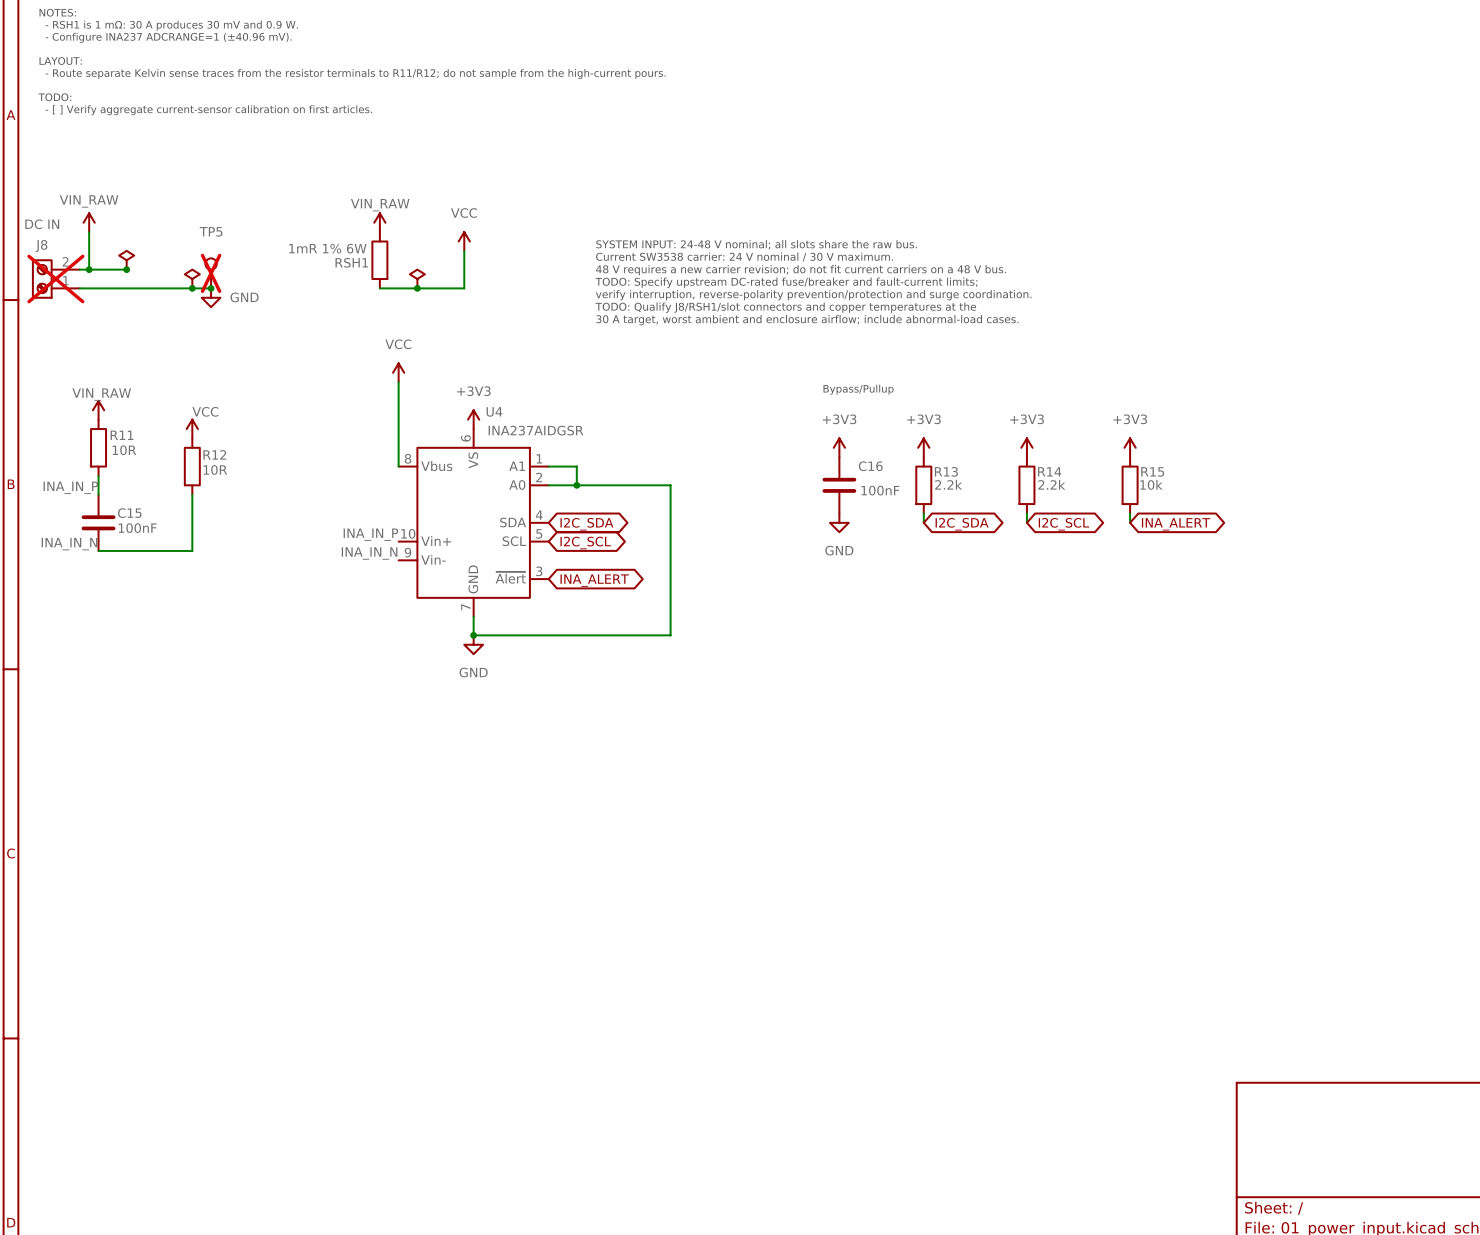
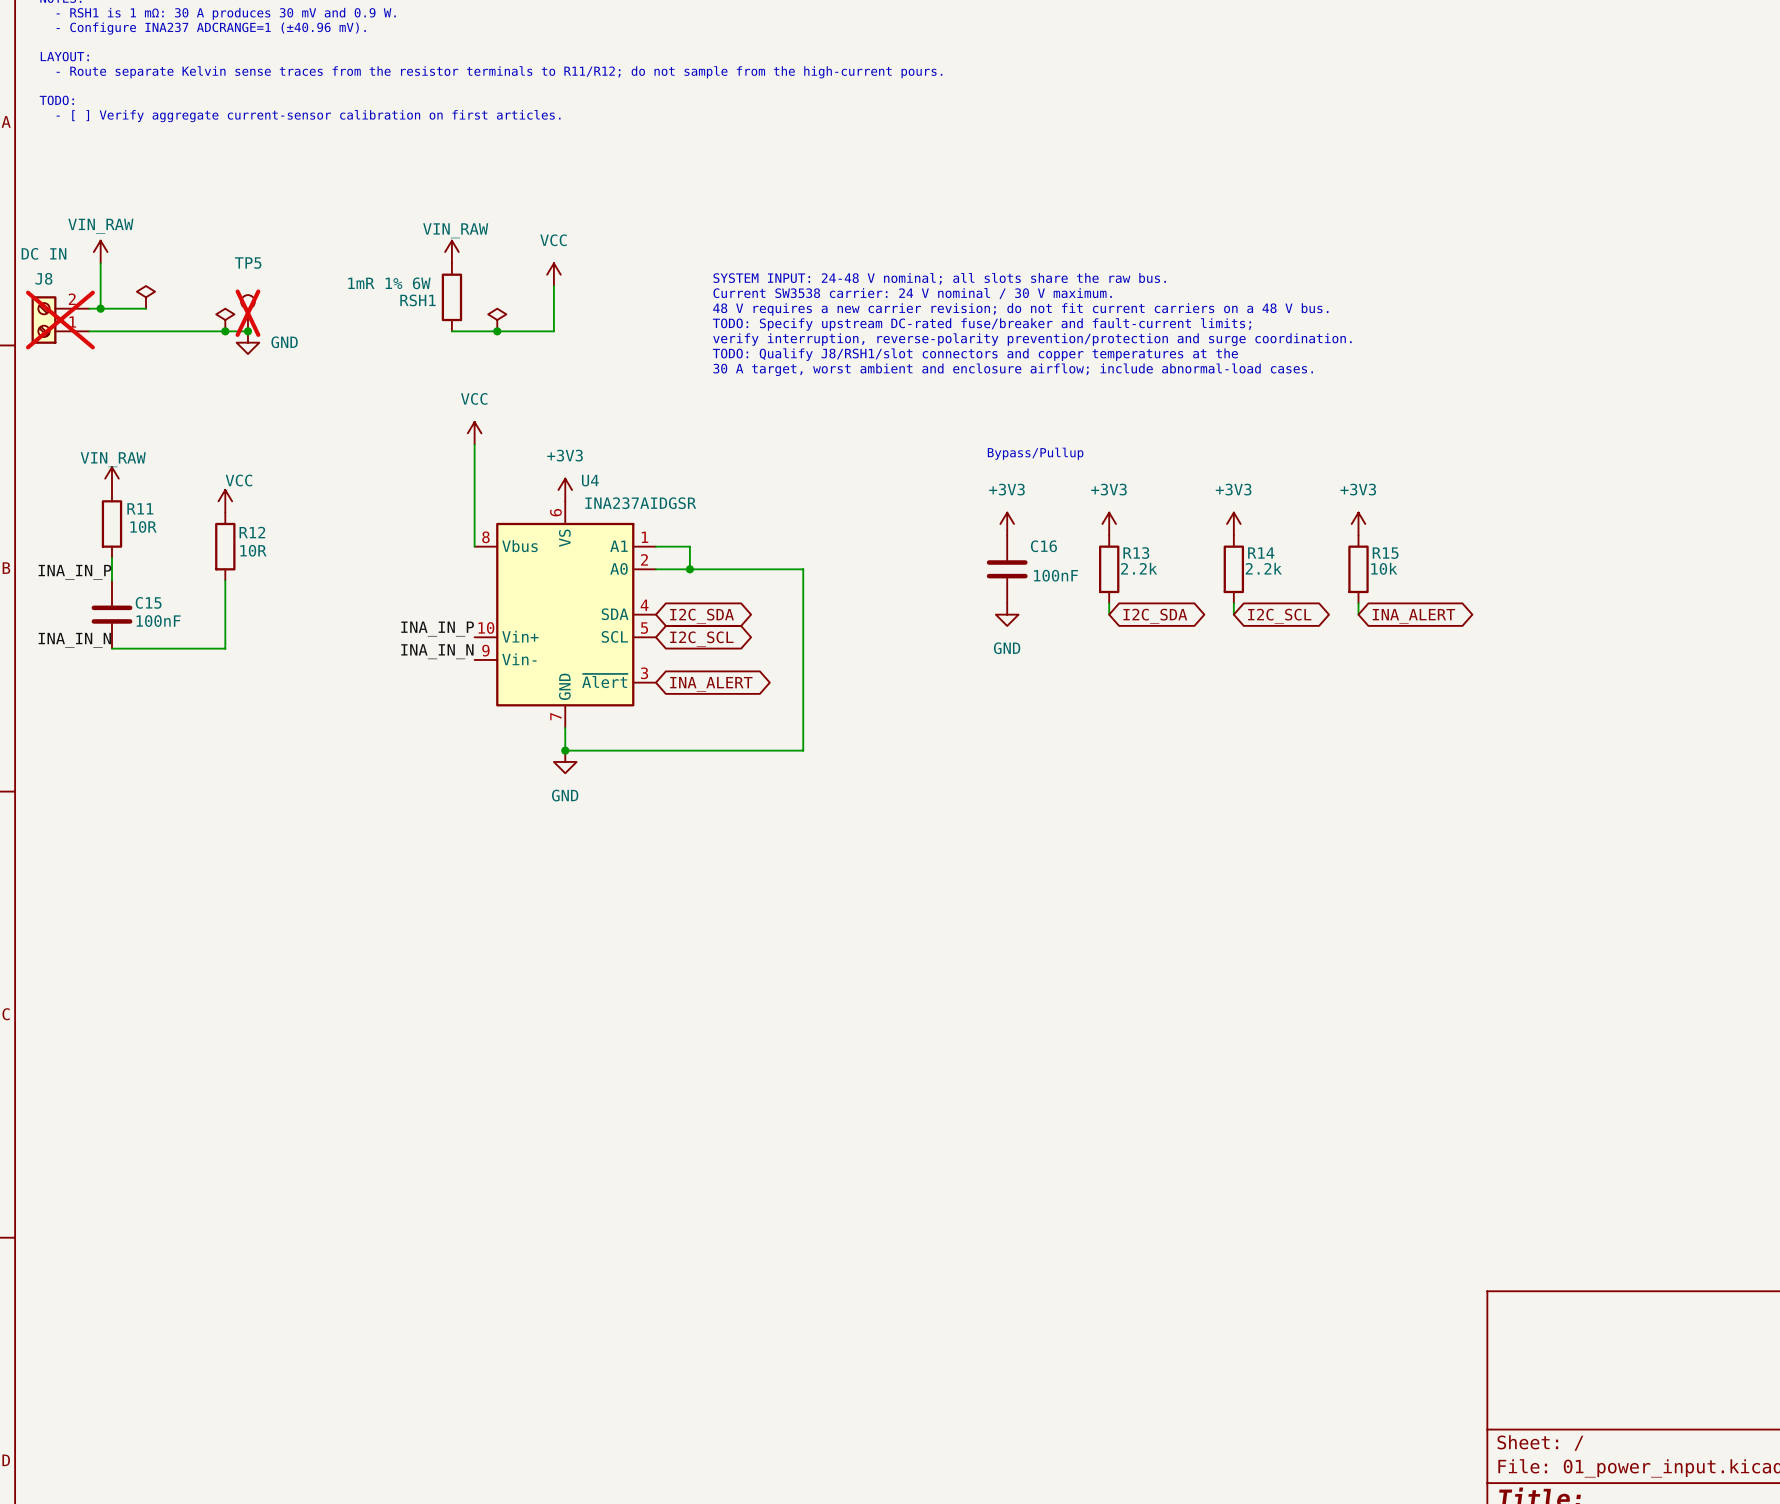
junction: (126, 269) -> none

